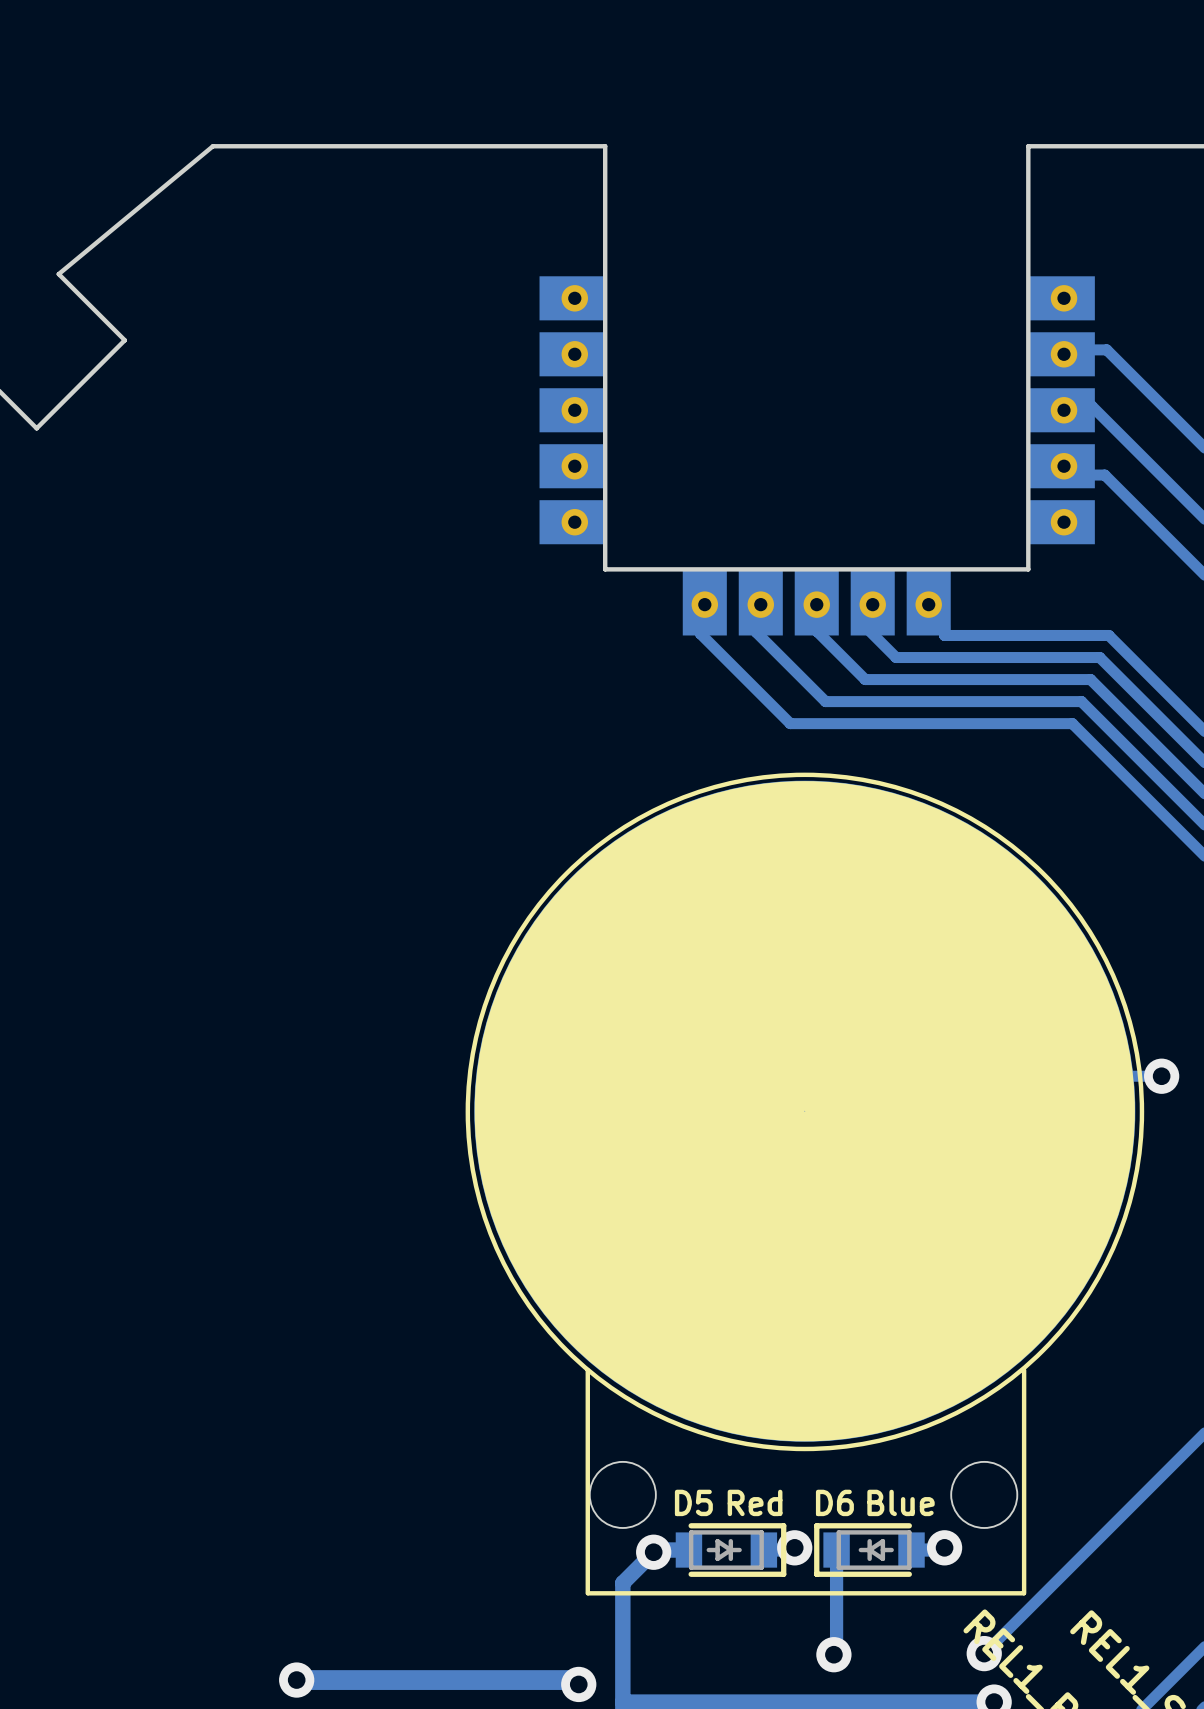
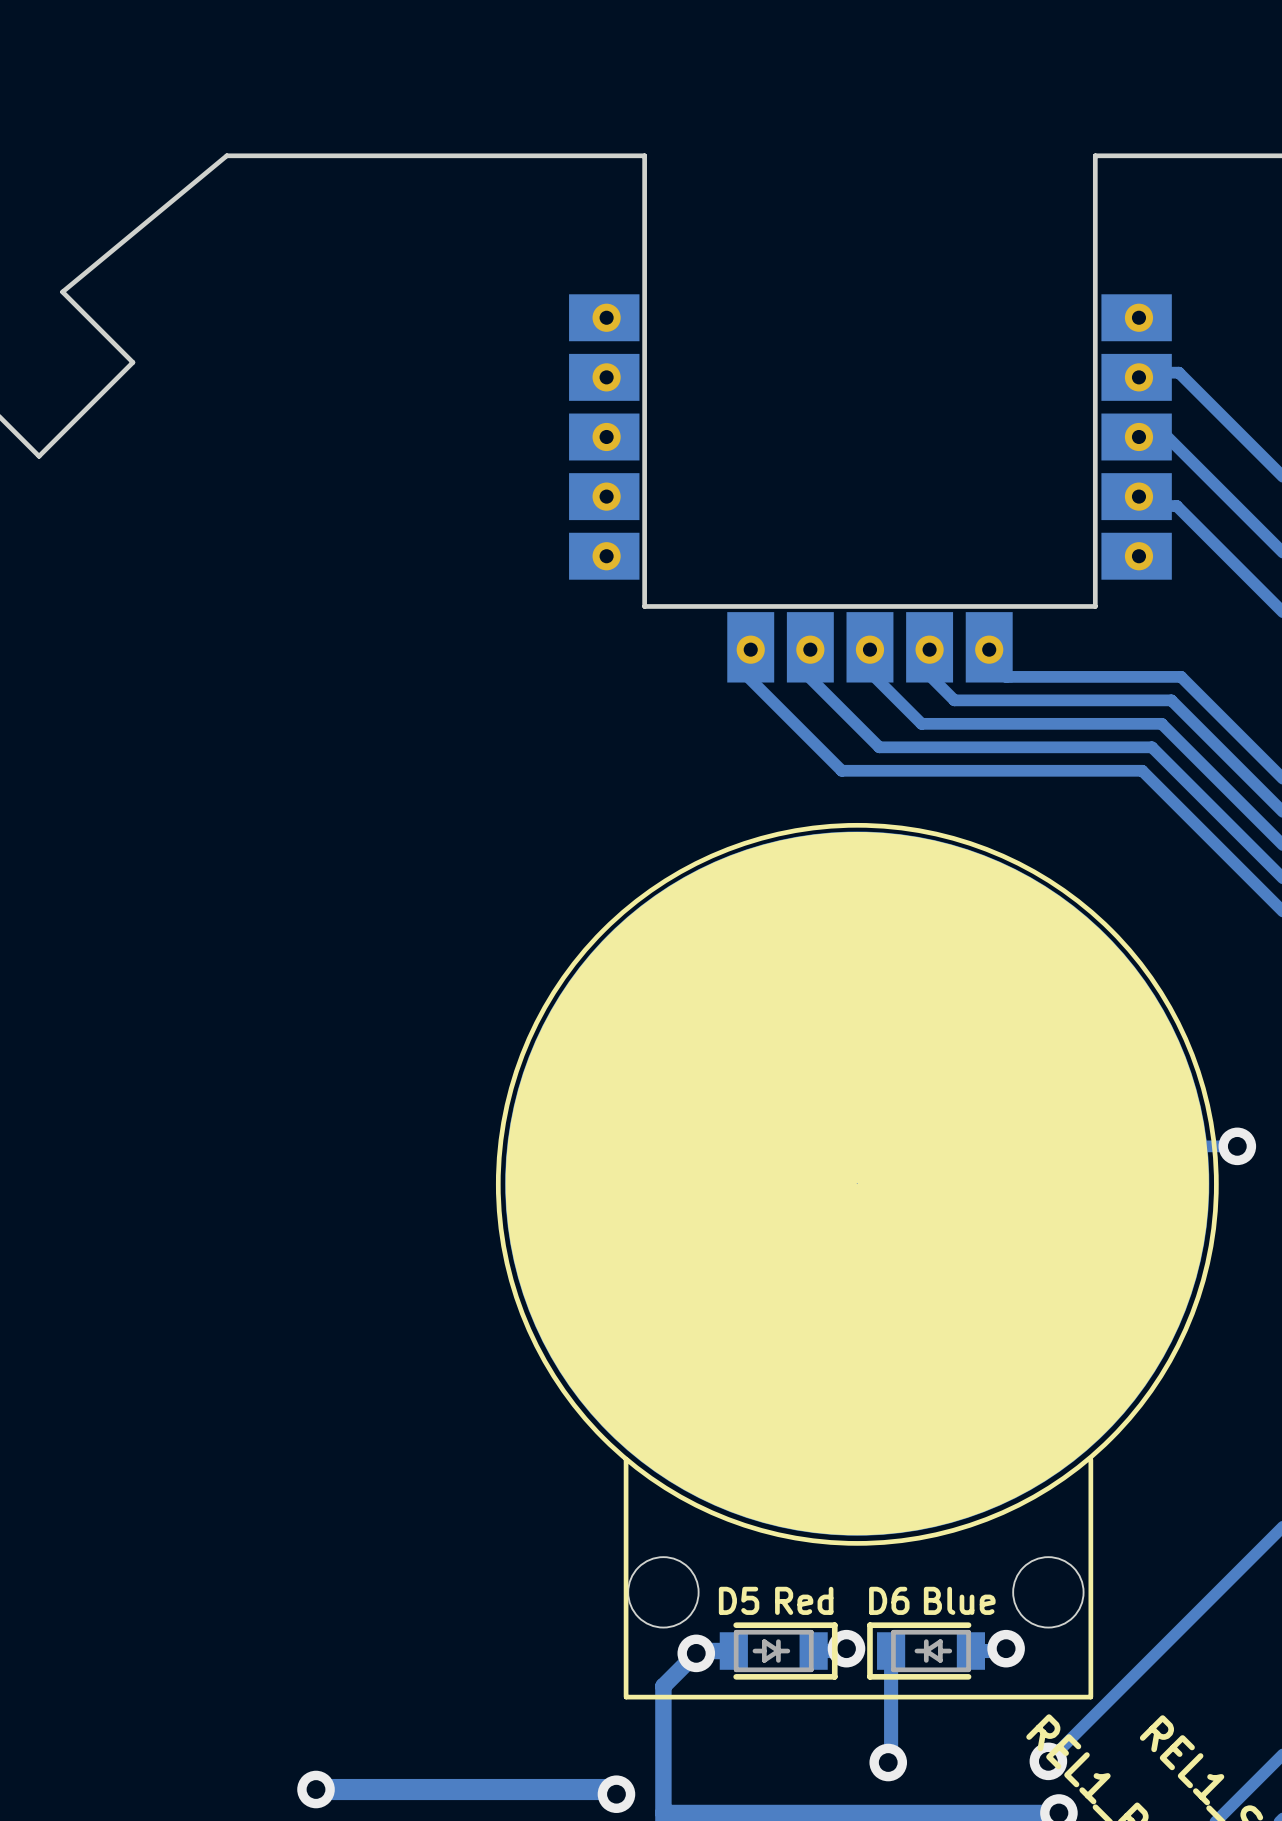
part footprint: [539, 276, 1095, 636] -> [569, 294, 1172, 683]

